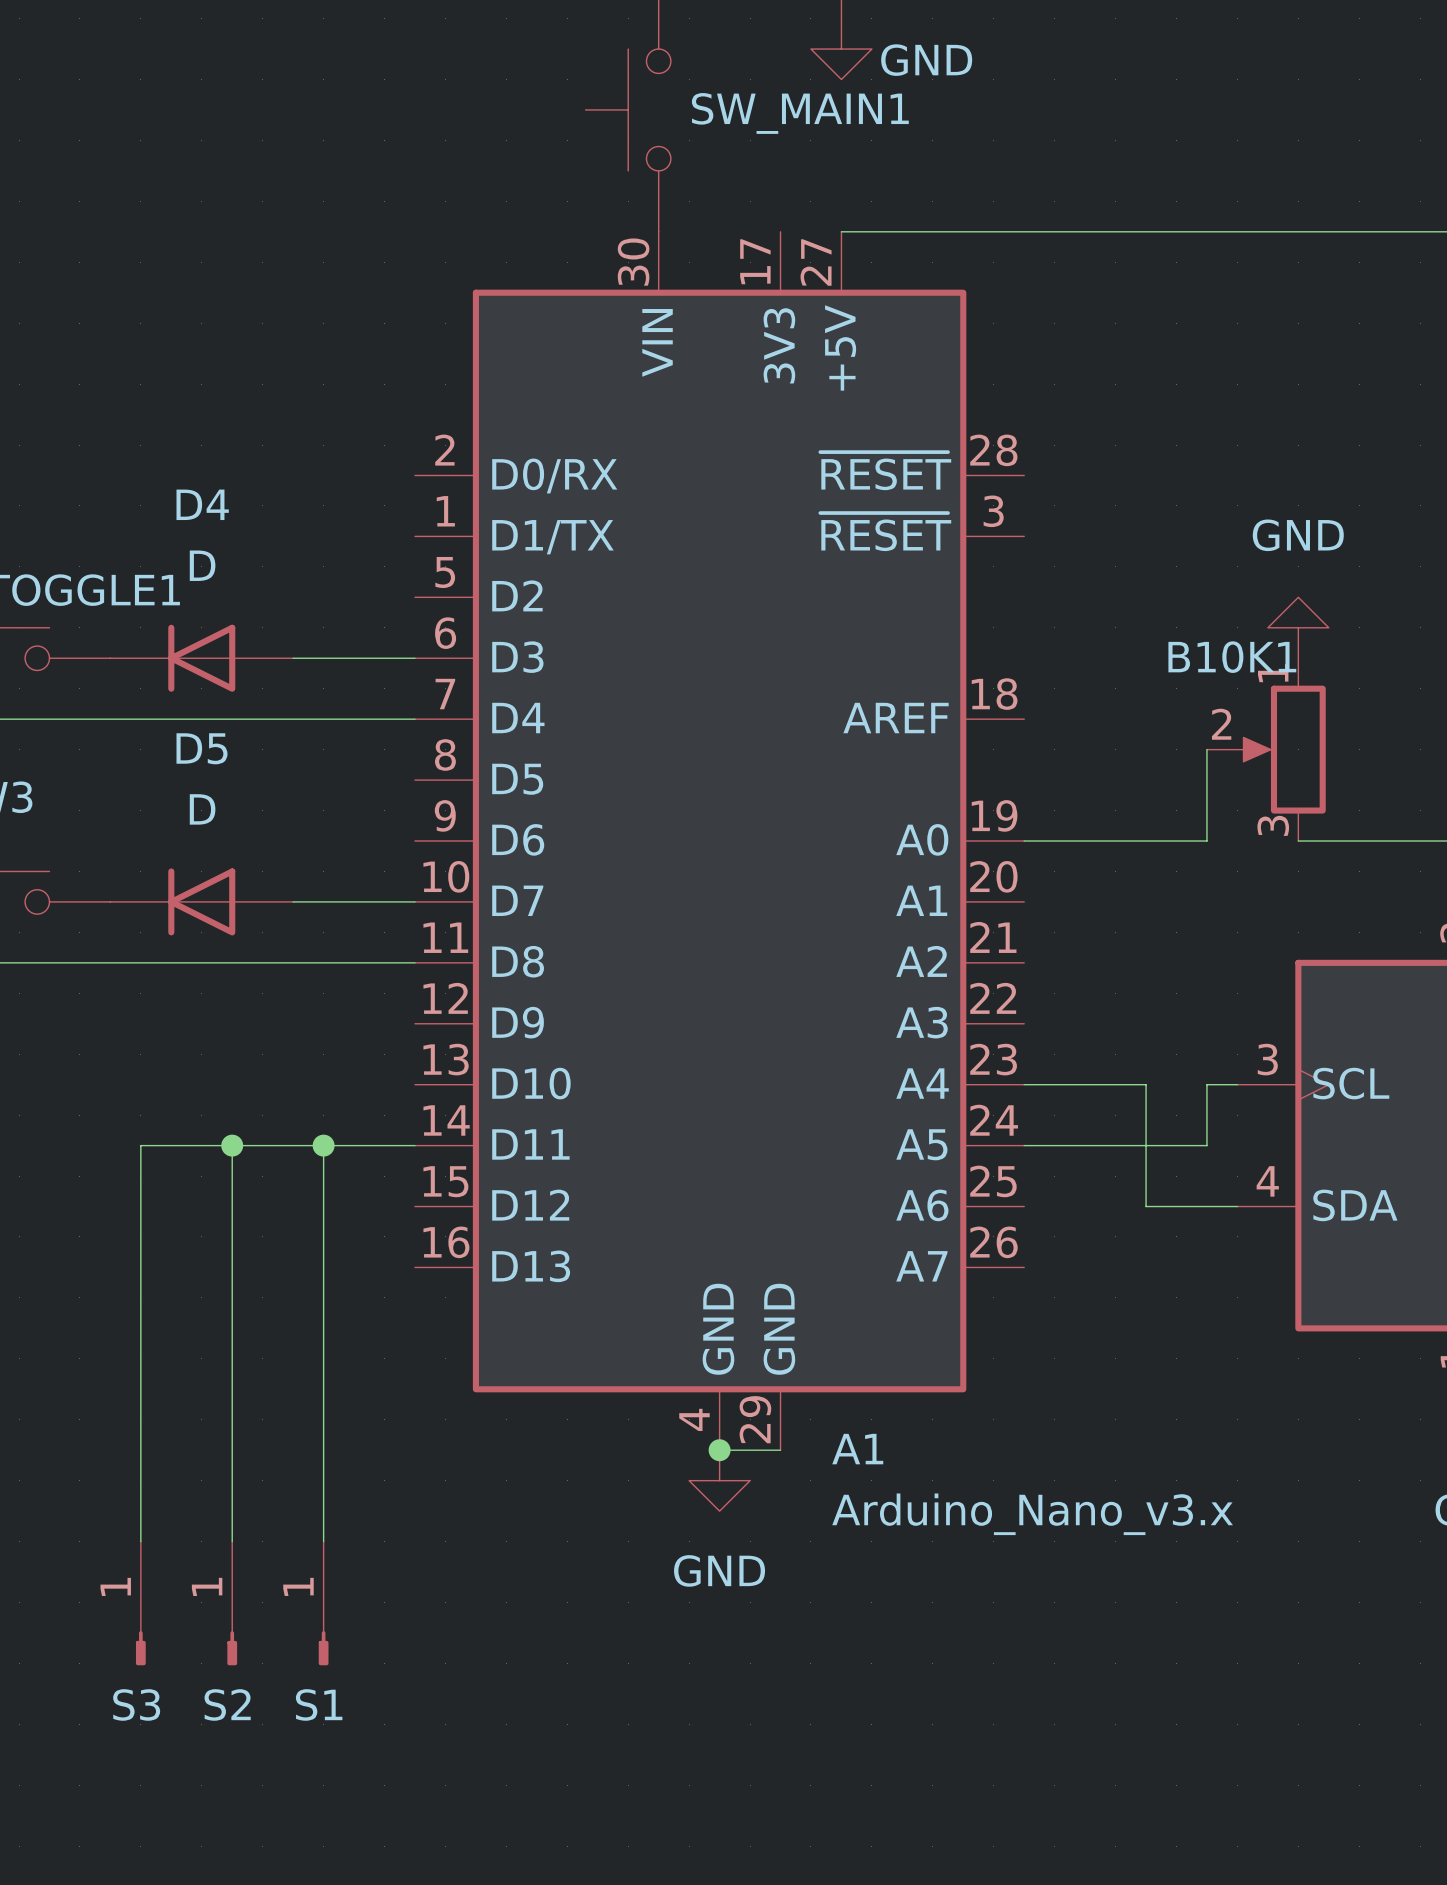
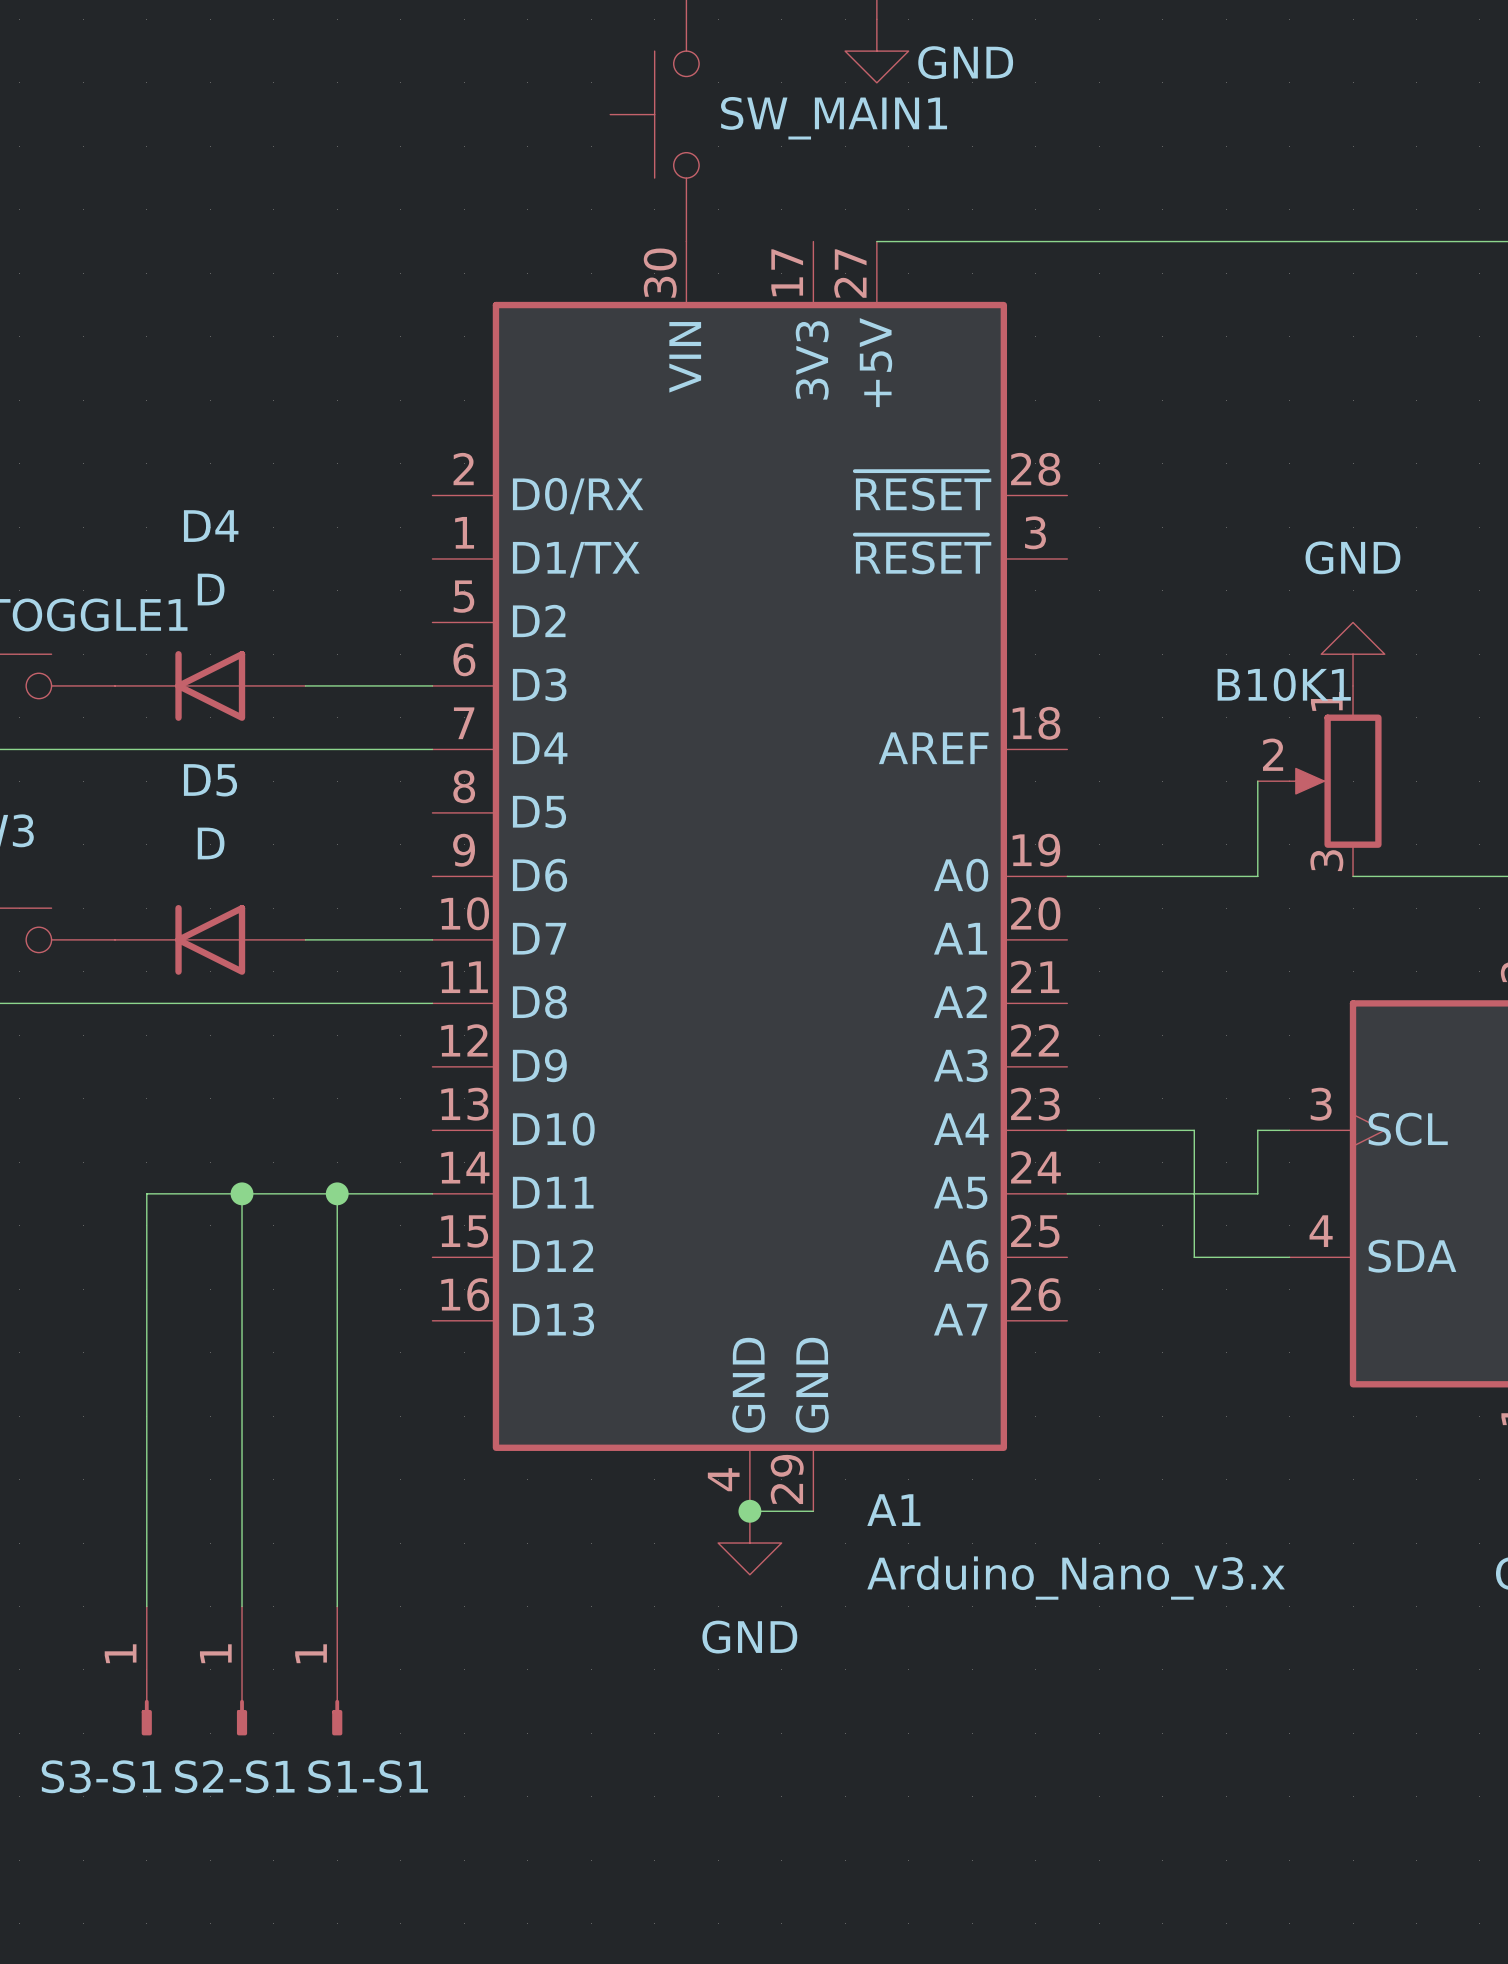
S3 name: S3 (136, 1704) -> S3-S1 (101, 1776)
S2 name: S2 (227, 1704) -> S2-S1 (234, 1776)
S1 name: S1 (319, 1704) -> S1-S1 (368, 1776)

